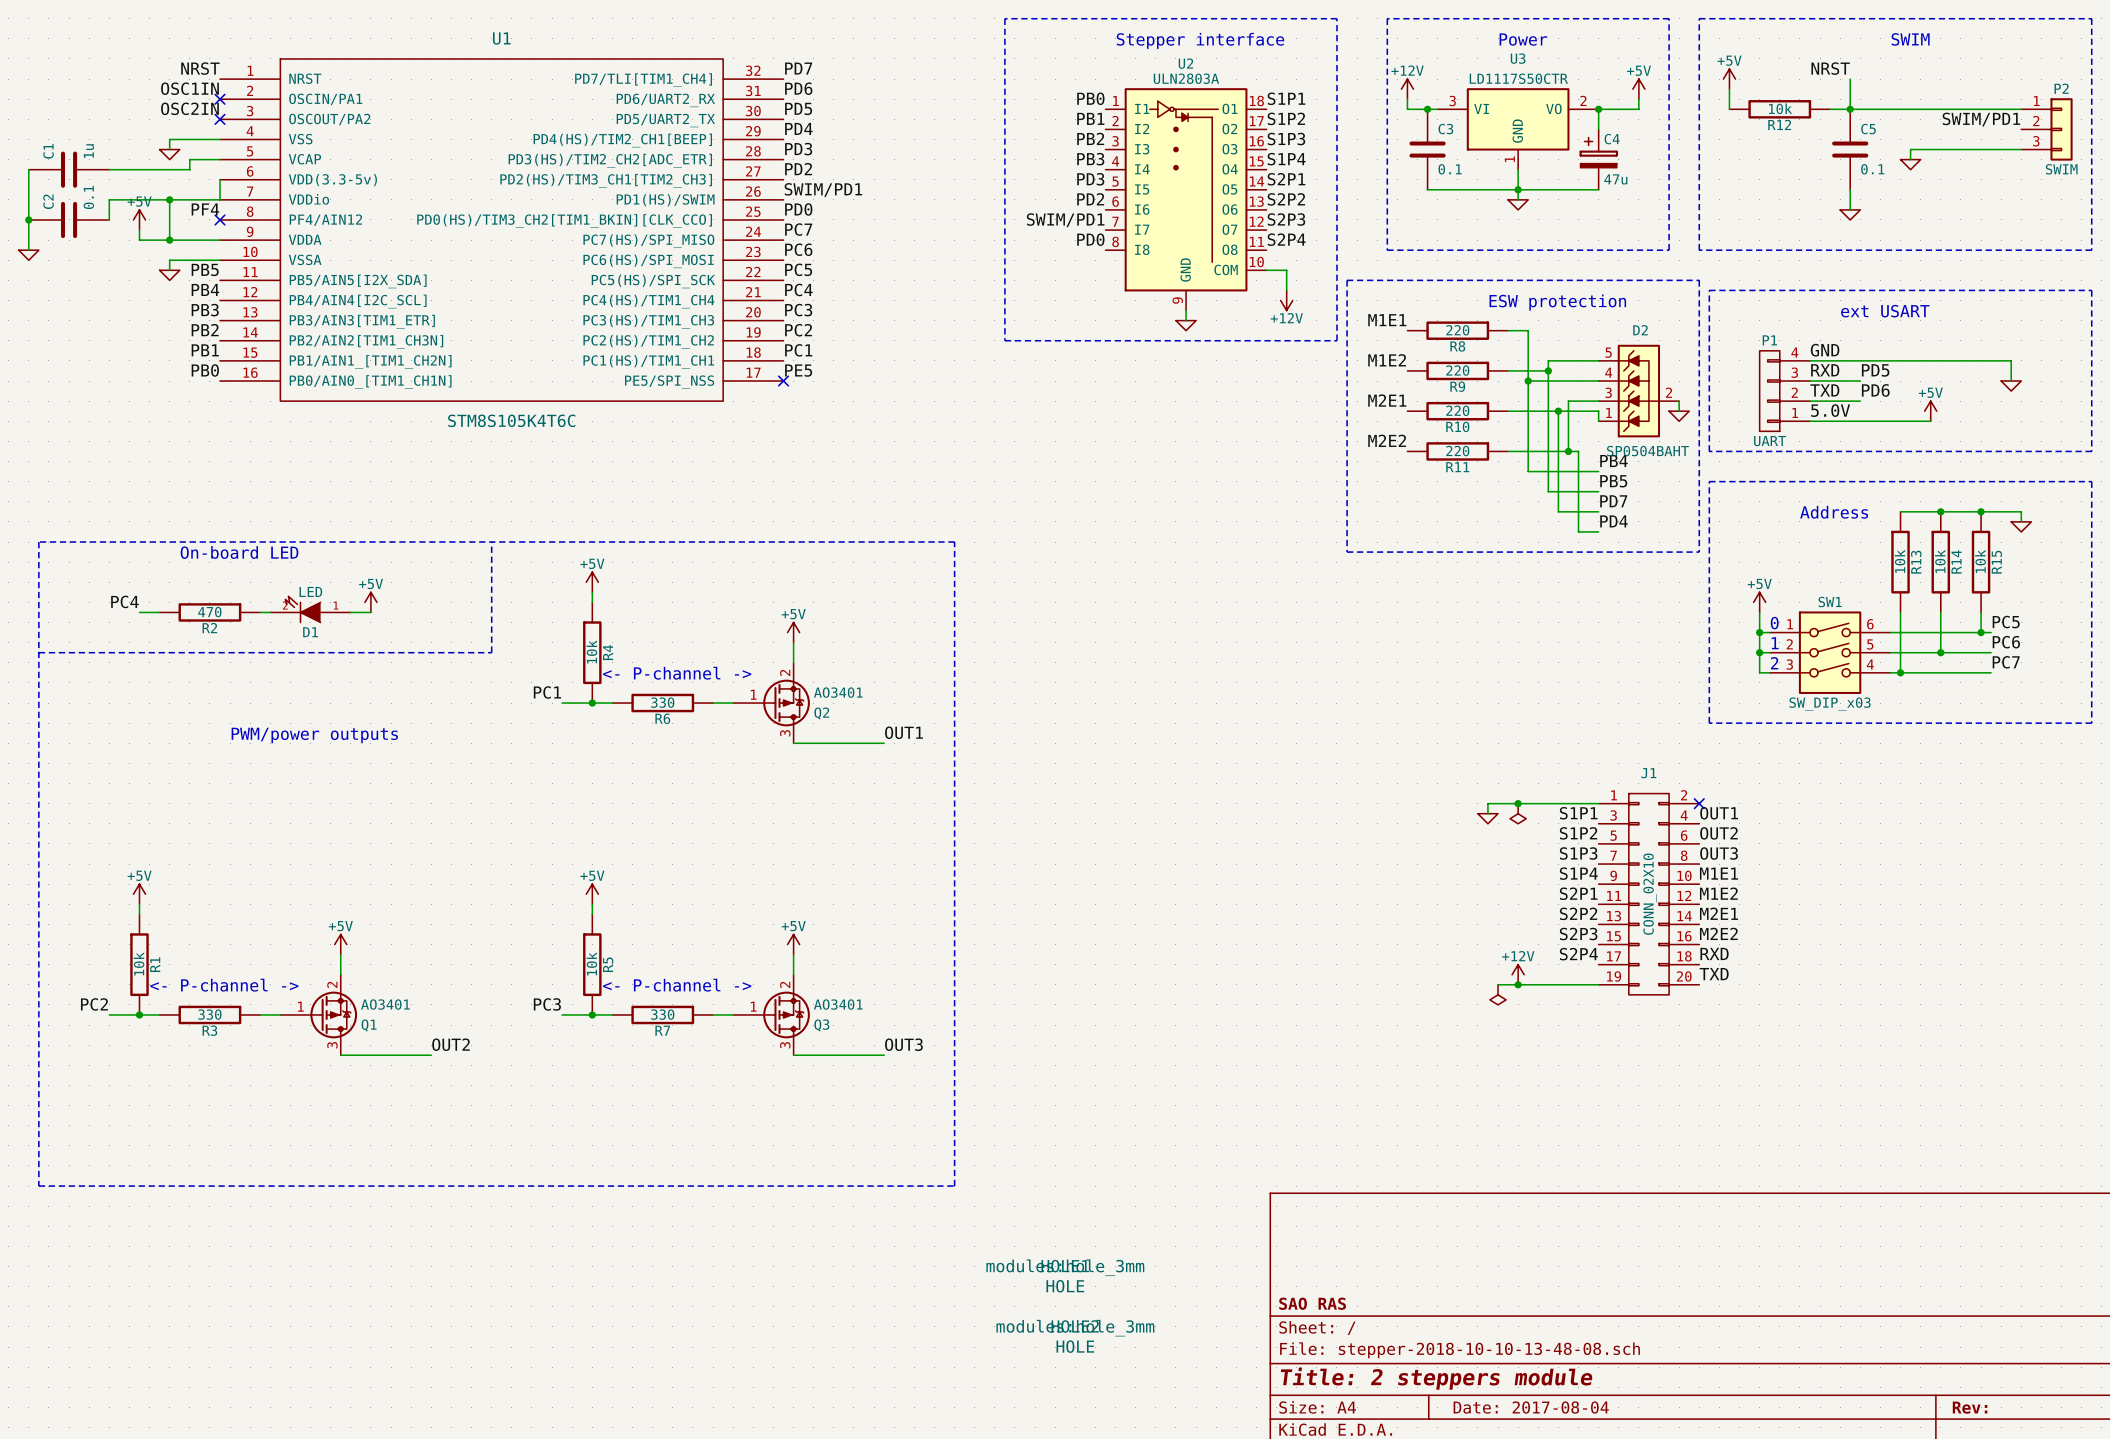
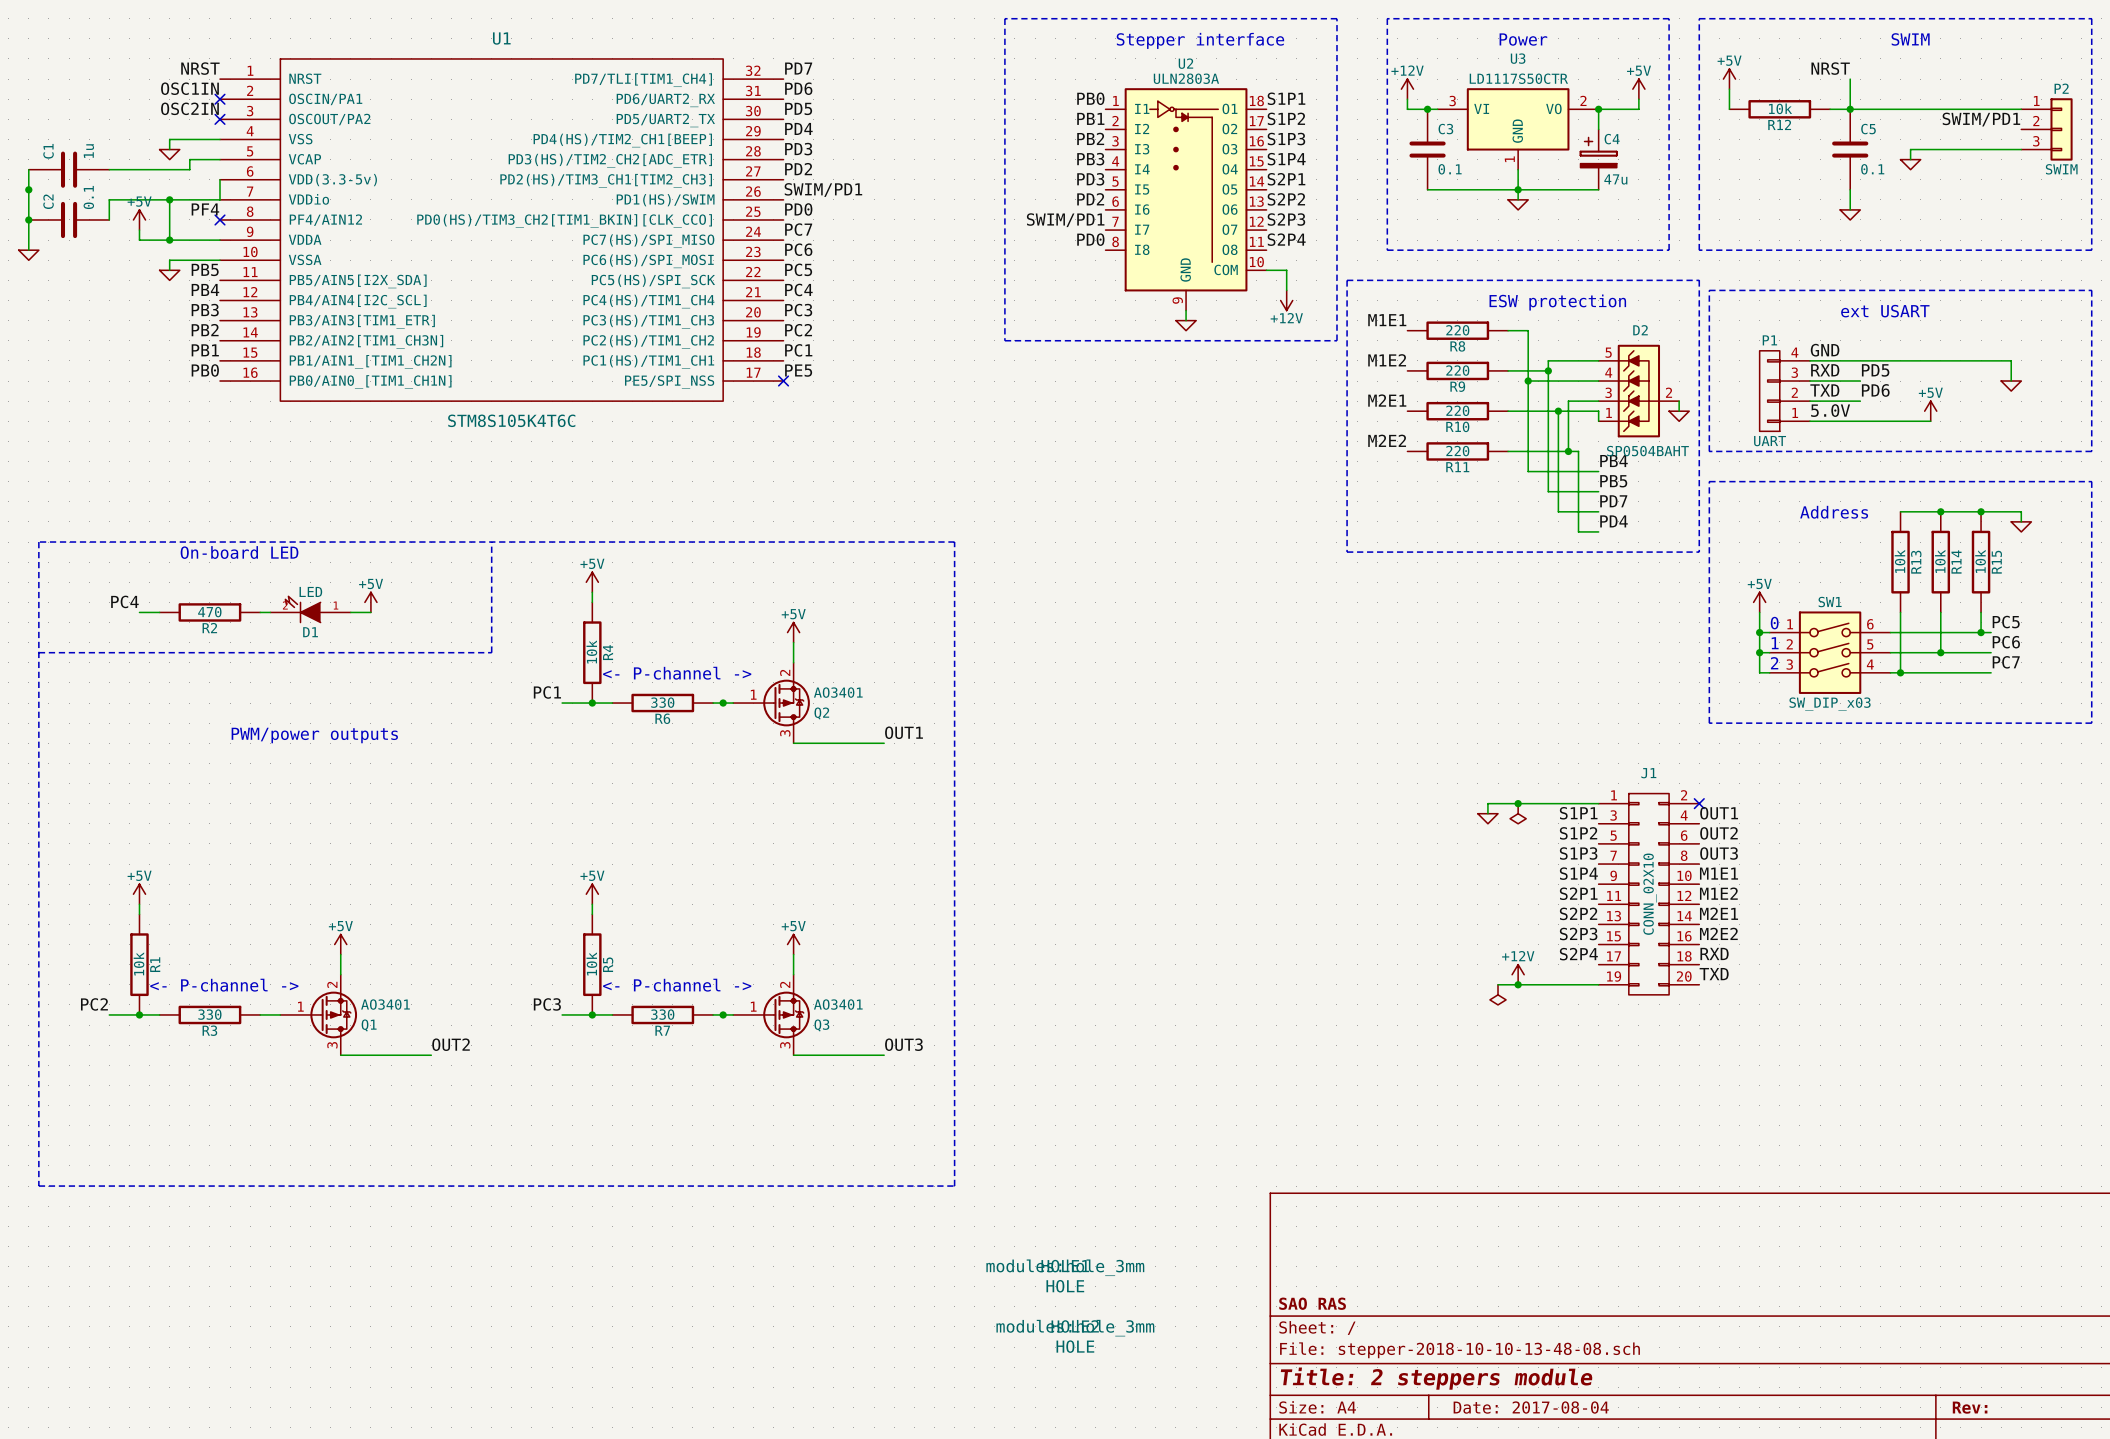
junction: none -> (28, 189)
junction: none -> (723, 703)
junction: none -> (723, 1014)

